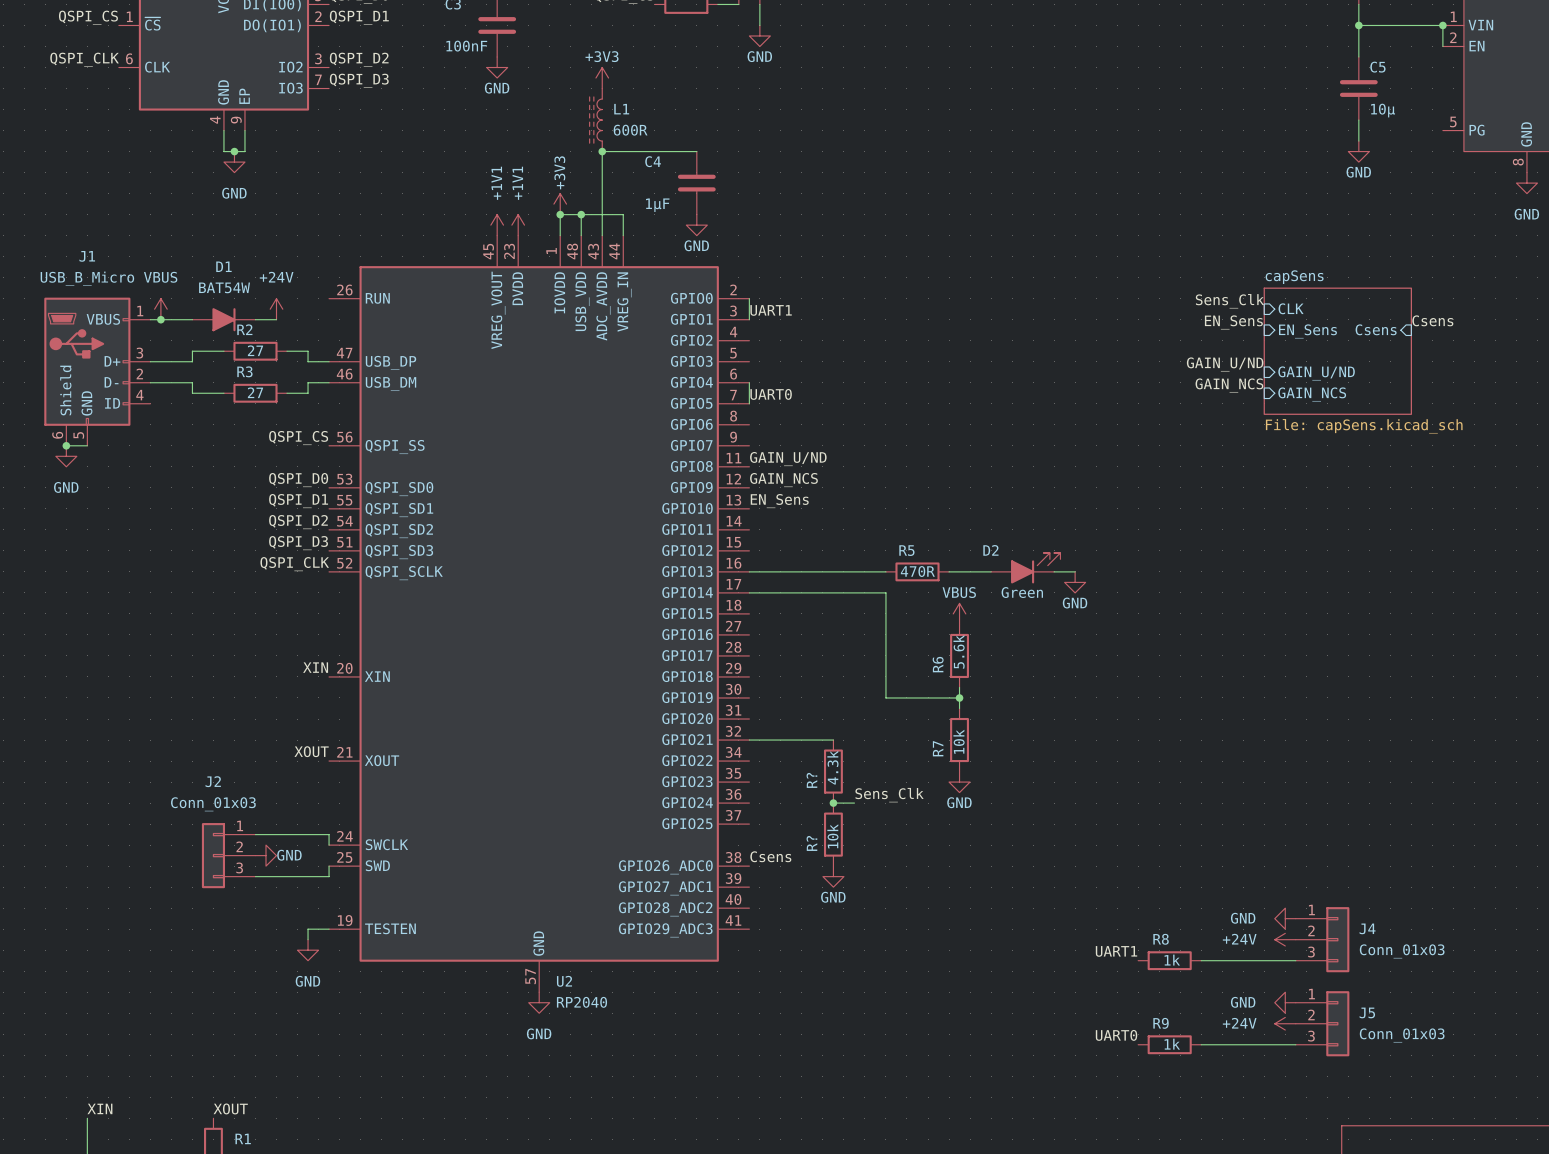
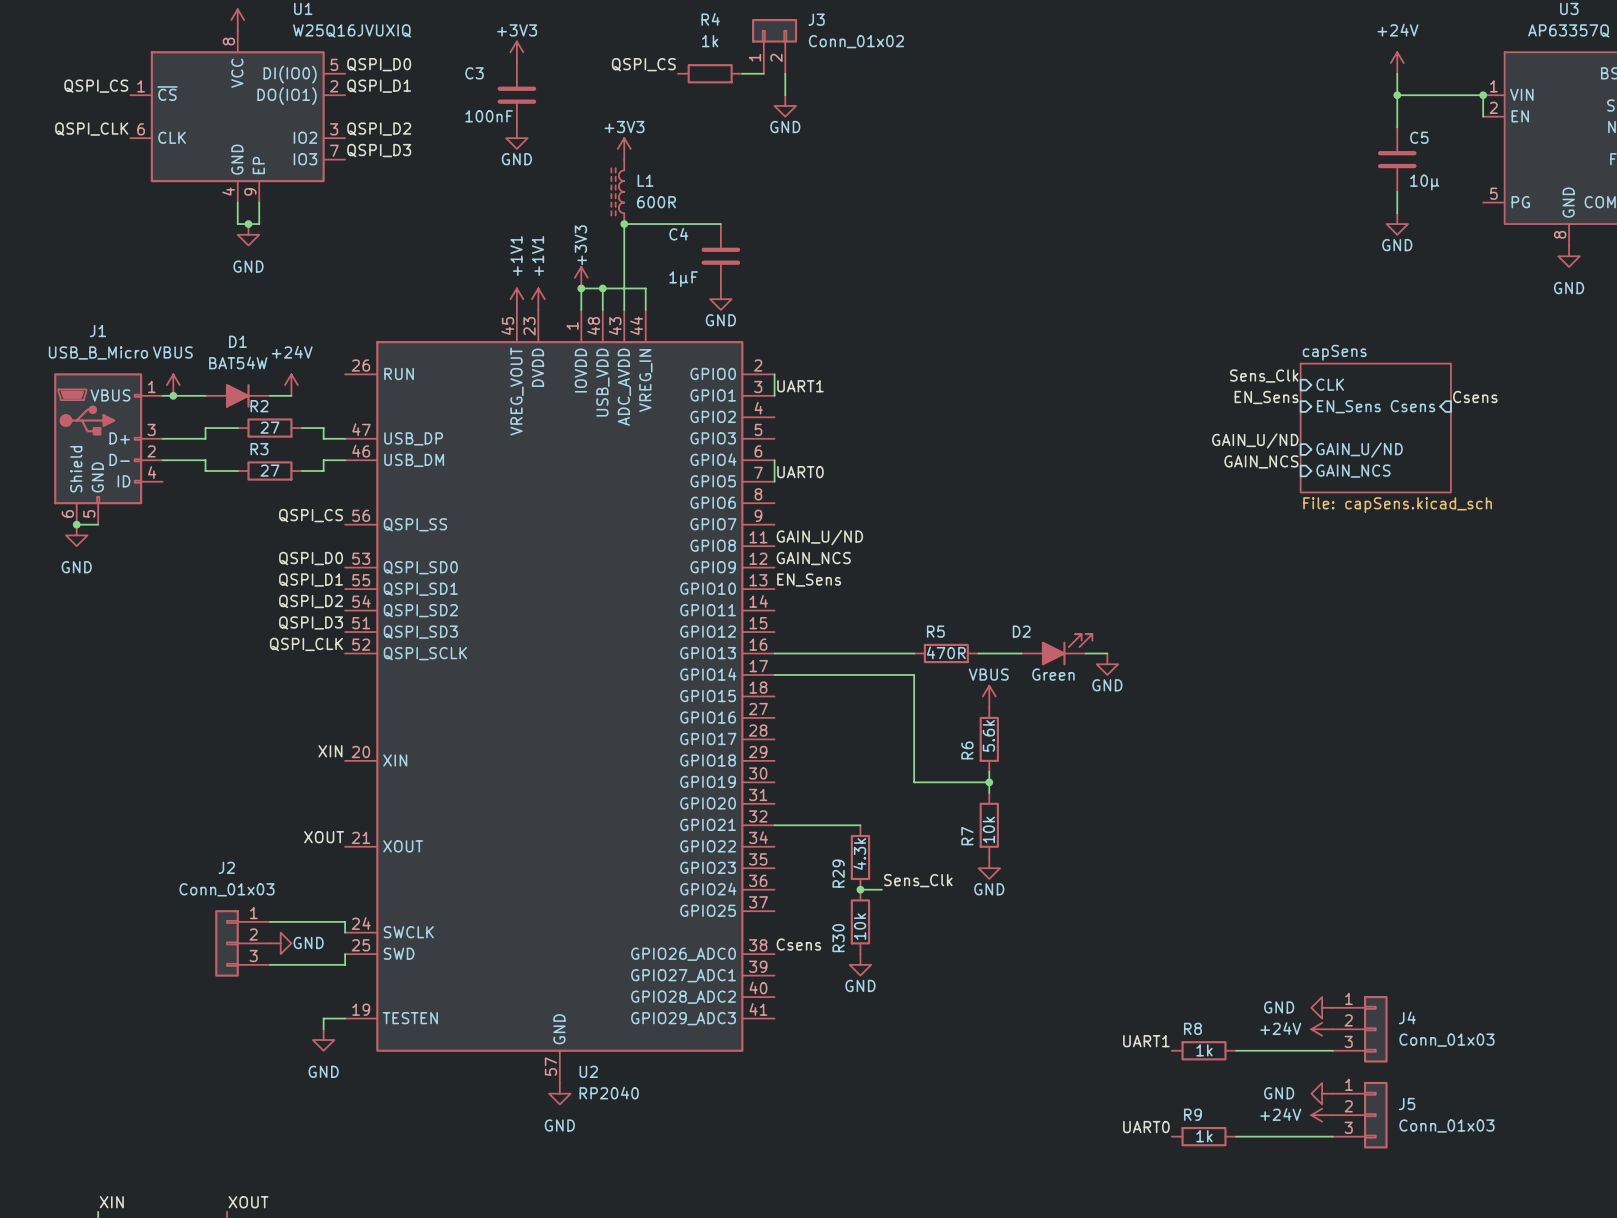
R? name: R? (811, 780) -> R29 (838, 873)
R? name: R? (811, 843) -> R30 (838, 938)

